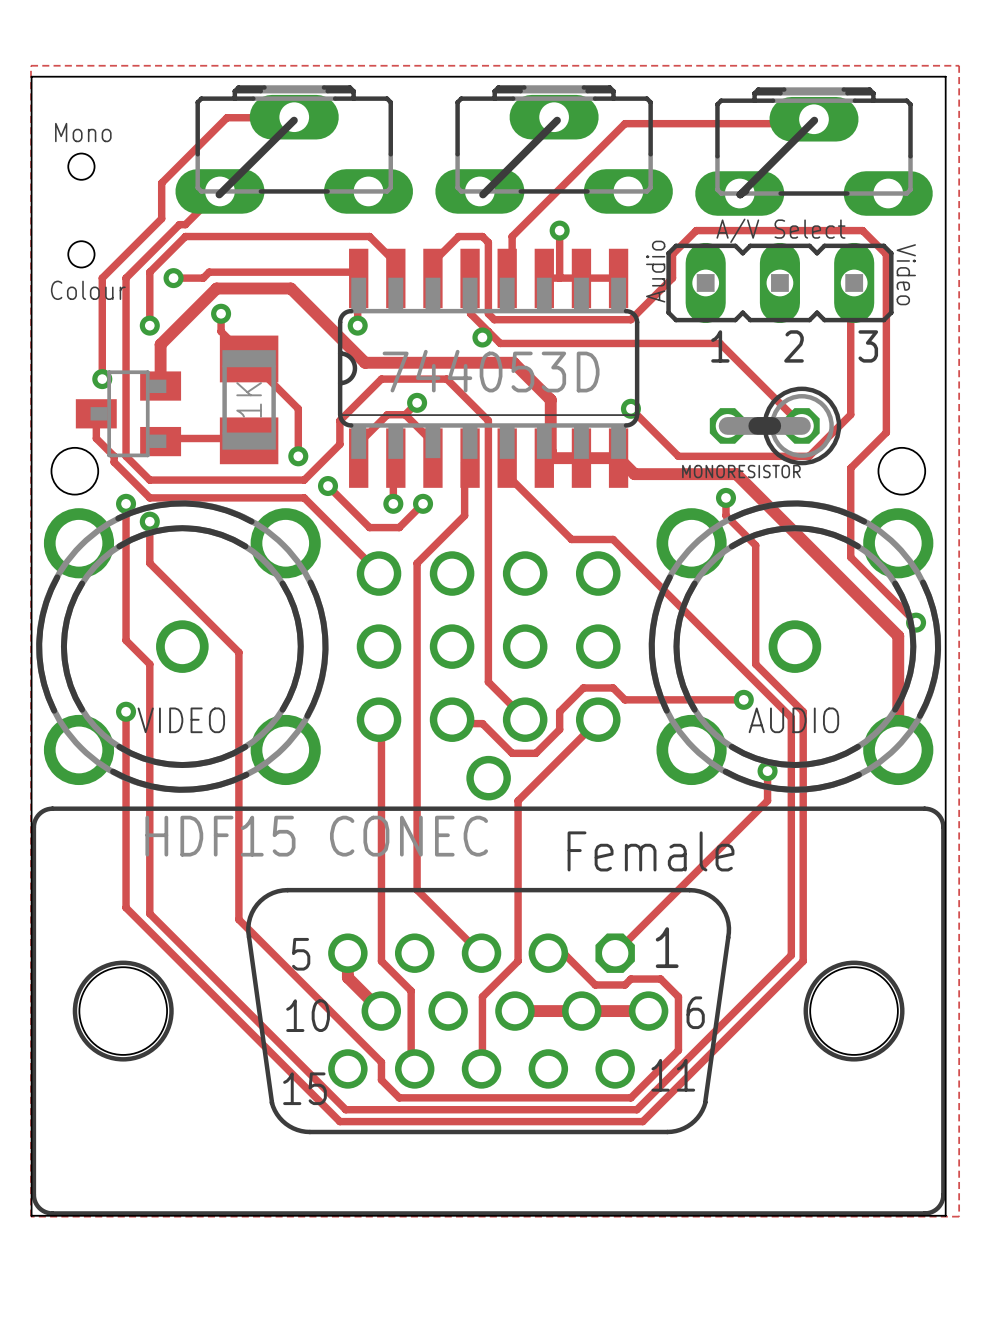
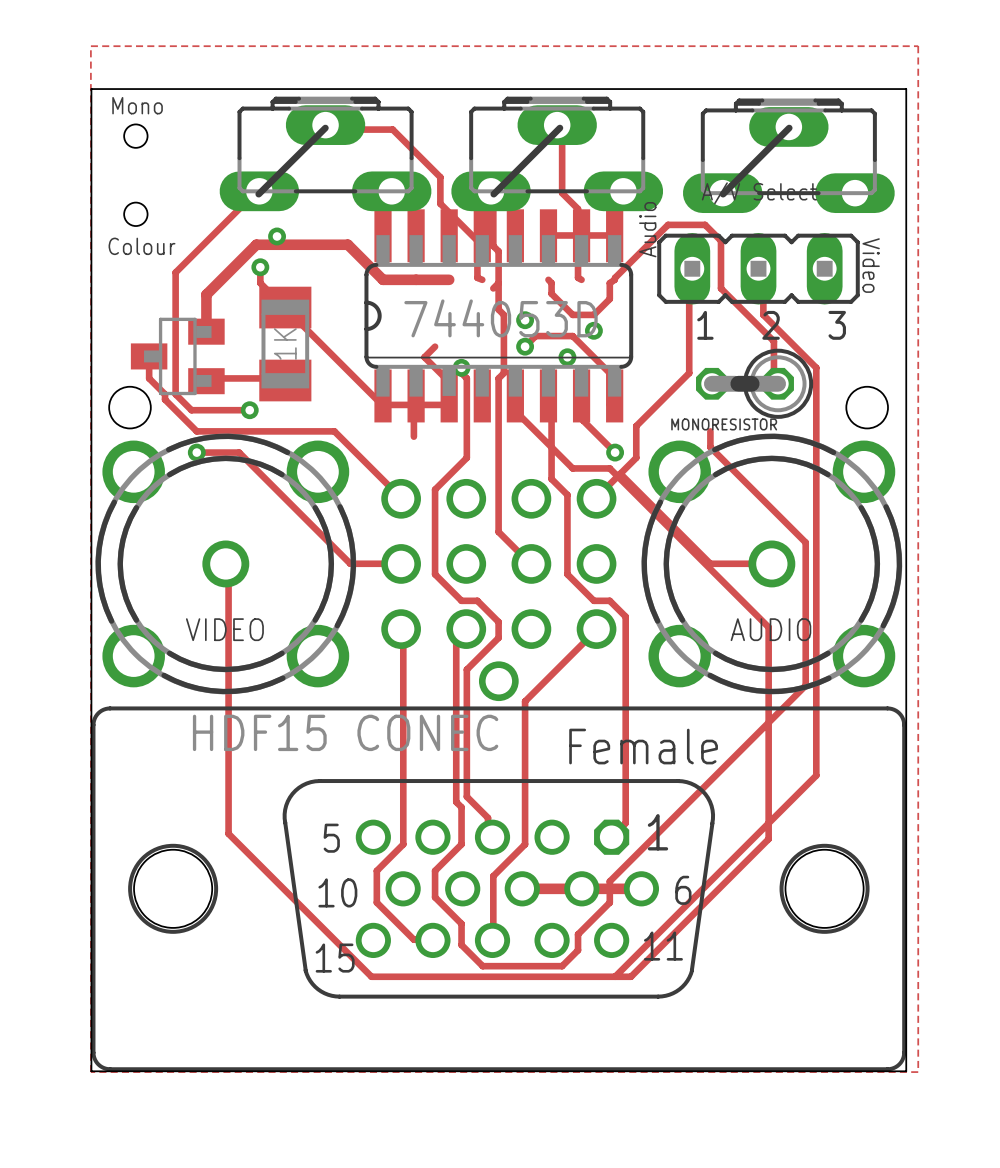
board edge: (31, 113) (31, 76) (945, 76) (945, 113) -> (91, 89) (906, 89)
track: (294, 117) (227, 117) (161, 183) (161, 218) (102, 278) (102, 379) -> none
track: (813, 119) (809, 123) (625, 123) (512, 236) (512, 278) (507, 278) -> none
line: (294, 120) (219, 194) -> (325, 128) (258, 194)
line: (557, 120) (482, 194) -> (559, 128) (493, 194)
line: (814, 120) (740, 194) (745, 191) -> none
part position: (294, 149) -> (325, 153)
part position: (554, 149) -> (557, 153)
part position: (813, 151) -> (788, 155)
track: none -> (325, 125) (329, 129) (392, 129) (440, 177) (440, 203) (477, 240) (477, 277) (482, 279)
track: none -> (557, 125) (562, 129) (562, 193) (578, 209) (578, 277) (581, 279)
line: none -> (789, 128) (723, 194)
track: (219, 191) (185, 224) (179, 224) (126, 278) (126, 319) -> (259, 191) (255, 193) (175, 272)
track: (559, 230) (559, 278) -> none
via: (559, 230) -> none
text position: Video (906, 274) -> Video (871, 265)
track: (173, 278) (203, 278) (209, 272) (351, 272) (358, 278) (357, 325) -> none
via: (173, 278) -> none
track: (395, 278) (393, 278) (393, 260) (369, 236) (185, 236) (149, 272) (149, 325) -> none
track: (432, 278) (434, 278) (434, 260) (458, 236) (482, 236) (488, 242) (488, 295) -> (491, 191) (493, 193) (493, 246) (498, 251)
track: (470, 278) (470, 313) (500, 343) (720, 343) (801, 425) -> none
via: none -> (277, 236)
part position: (779, 282) -> (758, 268)
track: (854, 282) (850, 284) (850, 414) (809, 456) (678, 456) (630, 408) -> none
track: (290, 288) (365, 362) (513, 362) (550, 399) (550, 451) (544, 458) (618, 458) (634, 474) (736, 474) (898, 636) (898, 749) -> (322, 244) (347, 244) (383, 279) (449, 279)
track: (488, 313) (494, 319) (630, 319) (672, 278) (672, 254) (696, 230) (862, 230) (886, 254) (886, 432) (850, 468) (850, 557) (916, 622) -> (498, 267) (498, 309) (503, 314) (503, 373) (498, 378)
track: none -> (692, 268) (689, 272) (689, 373) (636, 426) (636, 457) (596, 498)
via: (149, 325) -> none
via: (357, 325) -> none
track: none -> (548, 279) (551, 283) (551, 293) (572, 314) (593, 314) (609, 299) (609, 283) (668, 224) (705, 224) (720, 240) (720, 288) (773, 341) (773, 383) (778, 383)
via: (482, 337) -> none
via: none -> (525, 320)
via: (102, 379) -> none
via: none -> (593, 330)
via position: (417, 402) -> (461, 367)
track: none -> (525, 346) (535, 336) (572, 336) (609, 373) (609, 404) (614, 408)
via: none -> (525, 346)
track: (298, 408) (298, 456) -> (329, 351) (382, 404) (383, 408) (387, 404) (413, 404) (416, 408) (419, 404) (445, 404) (449, 408)
via: (630, 408) -> none
track: (405, 414) (387, 414) (363, 438) (363, 456) (358, 458) -> none
via: none -> (567, 357)
MONORESISTOR position: (775, 425) -> (754, 383)
track: (488, 438) (488, 420) (446, 379) (381, 379) (339, 420) (339, 444) (304, 480) (149, 480) (143, 474) -> (249, 410) (191, 410)
via: (298, 456) -> none
track: (470, 458) (464, 462) (464, 515) (452, 527) -> (461, 367) (461, 373) (466, 378) (466, 457)
track: none -> (581, 408) (583, 420) (615, 452)
via: none -> (249, 410)
track: (328, 486) (369, 527) (399, 527) (423, 503) -> none
via: (328, 486) -> none
via: (725, 497) -> none
track: (126, 503) (126, 640) (149, 664) (149, 913) (185, 949) -> (225, 563) (228, 569) (228, 833)
via: (126, 503) -> none
via: (393, 503) -> none
via: (423, 503) -> none
track: (149, 521) (149, 563) (238, 652) (238, 919) (381, 1062) (381, 1080) (399, 1097) (470, 1097) -> (196, 452) (239, 452) (350, 563) (401, 563)
via: none -> (615, 452)
track: none -> (620, 473) (710, 563) (771, 563)
track: (755, 545) (755, 664) (803, 711) (803, 961) (642, 1121) (339, 1121) (126, 907) (126, 711) -> (736, 473) (805, 542) (805, 685) (609, 881) (609, 902) (578, 934) (578, 950) (562, 966)
track: (488, 610) (488, 682) (525, 719) -> (498, 531) (531, 563)
via: (916, 622) -> none
track: (417, 658) (417, 889) (440, 913) -> (435, 574) (461, 600) (477, 600) (498, 622) (498, 637) (466, 669) (466, 796) (488, 817) (488, 833)
track: (595, 687) (583, 687) (559, 711) (559, 729) (535, 753) (512, 753) (482, 723) (452, 723) (452, 719) -> (593, 600) (567, 574) (567, 494) (551, 479) (551, 410) (548, 408)
track: (625, 699) (743, 699) -> none
via: (743, 699) -> none
via: (126, 711) -> none
track: none -> (466, 629) (456, 637) (456, 802)
track: (767, 771) (767, 800) (630, 937) -> (620, 611) (625, 616) (625, 823)
via: (767, 771) -> none
track: (446, 919) (476, 949) -> (461, 807) (461, 844) (435, 870) (435, 897) (461, 923) (461, 944) (482, 966)
track: (347, 953) (347, 977) (381, 1011) -> none
track: (548, 953) (565, 955) (595, 984) (625, 984) (630, 979) (660, 979) (678, 996) (678, 1050) -> (758, 268) (763, 272) (763, 314) (816, 367) (816, 775) (668, 923)
track: (381, 961) (411, 990) (411, 1068) -> (403, 844) (376, 870) (376, 902) (413, 939) (429, 939)
track: (559, 1097) (630, 1097) -> (615, 976) (625, 966)

